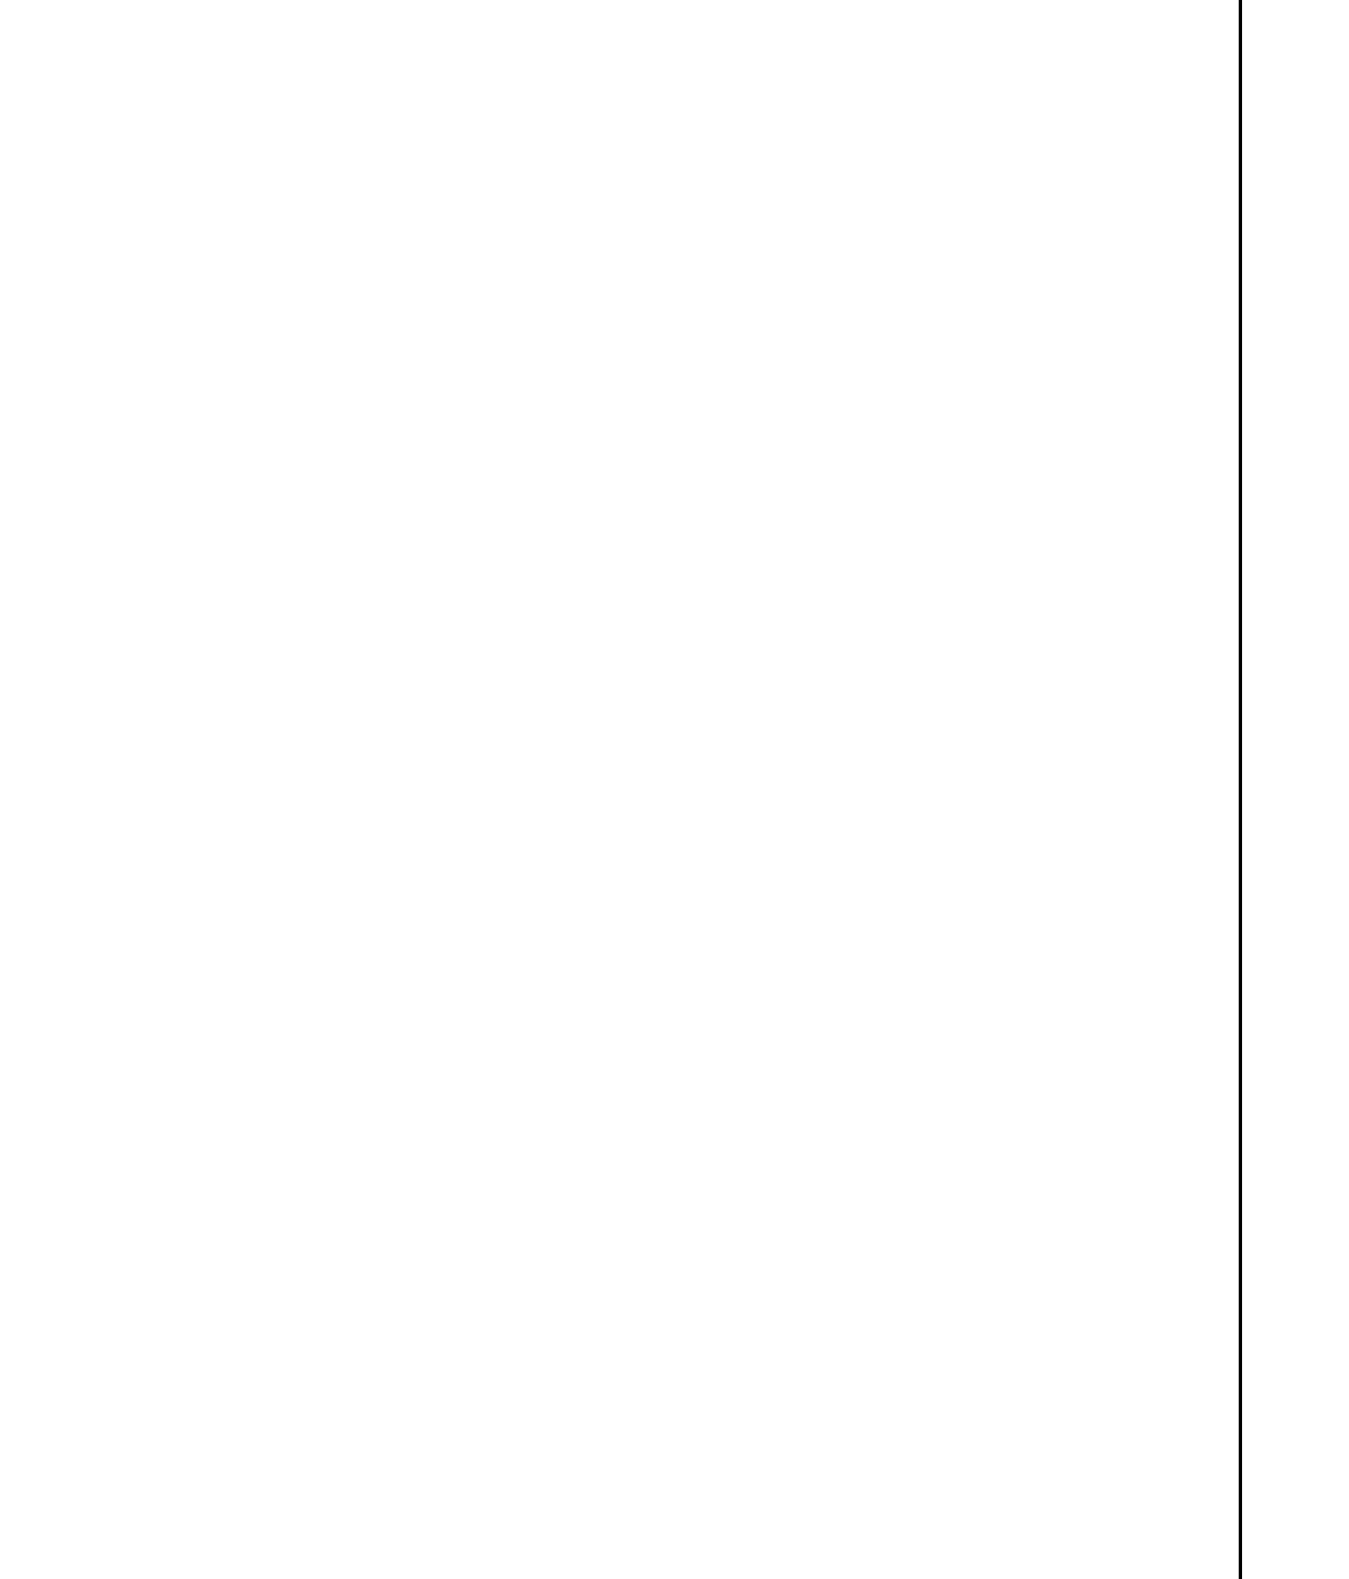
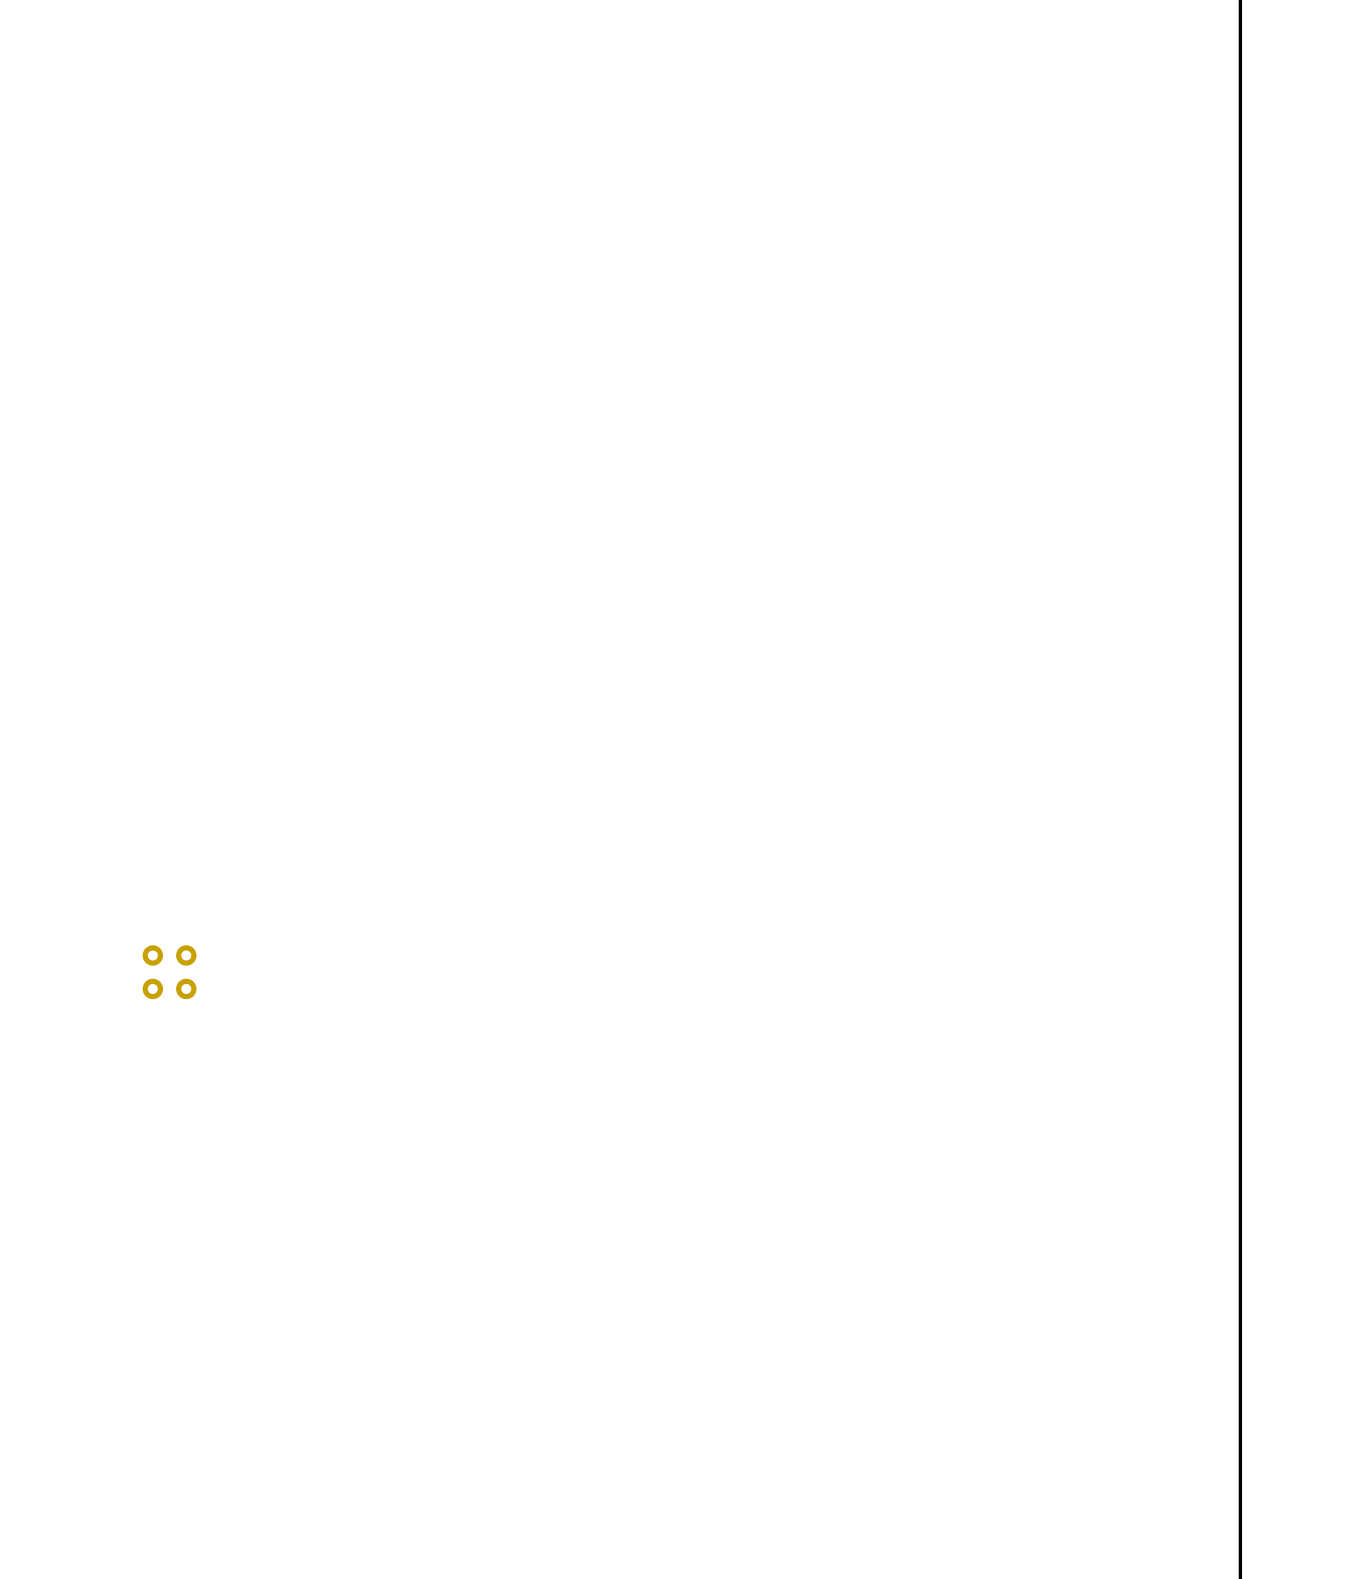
part: none -> (169, 972)

